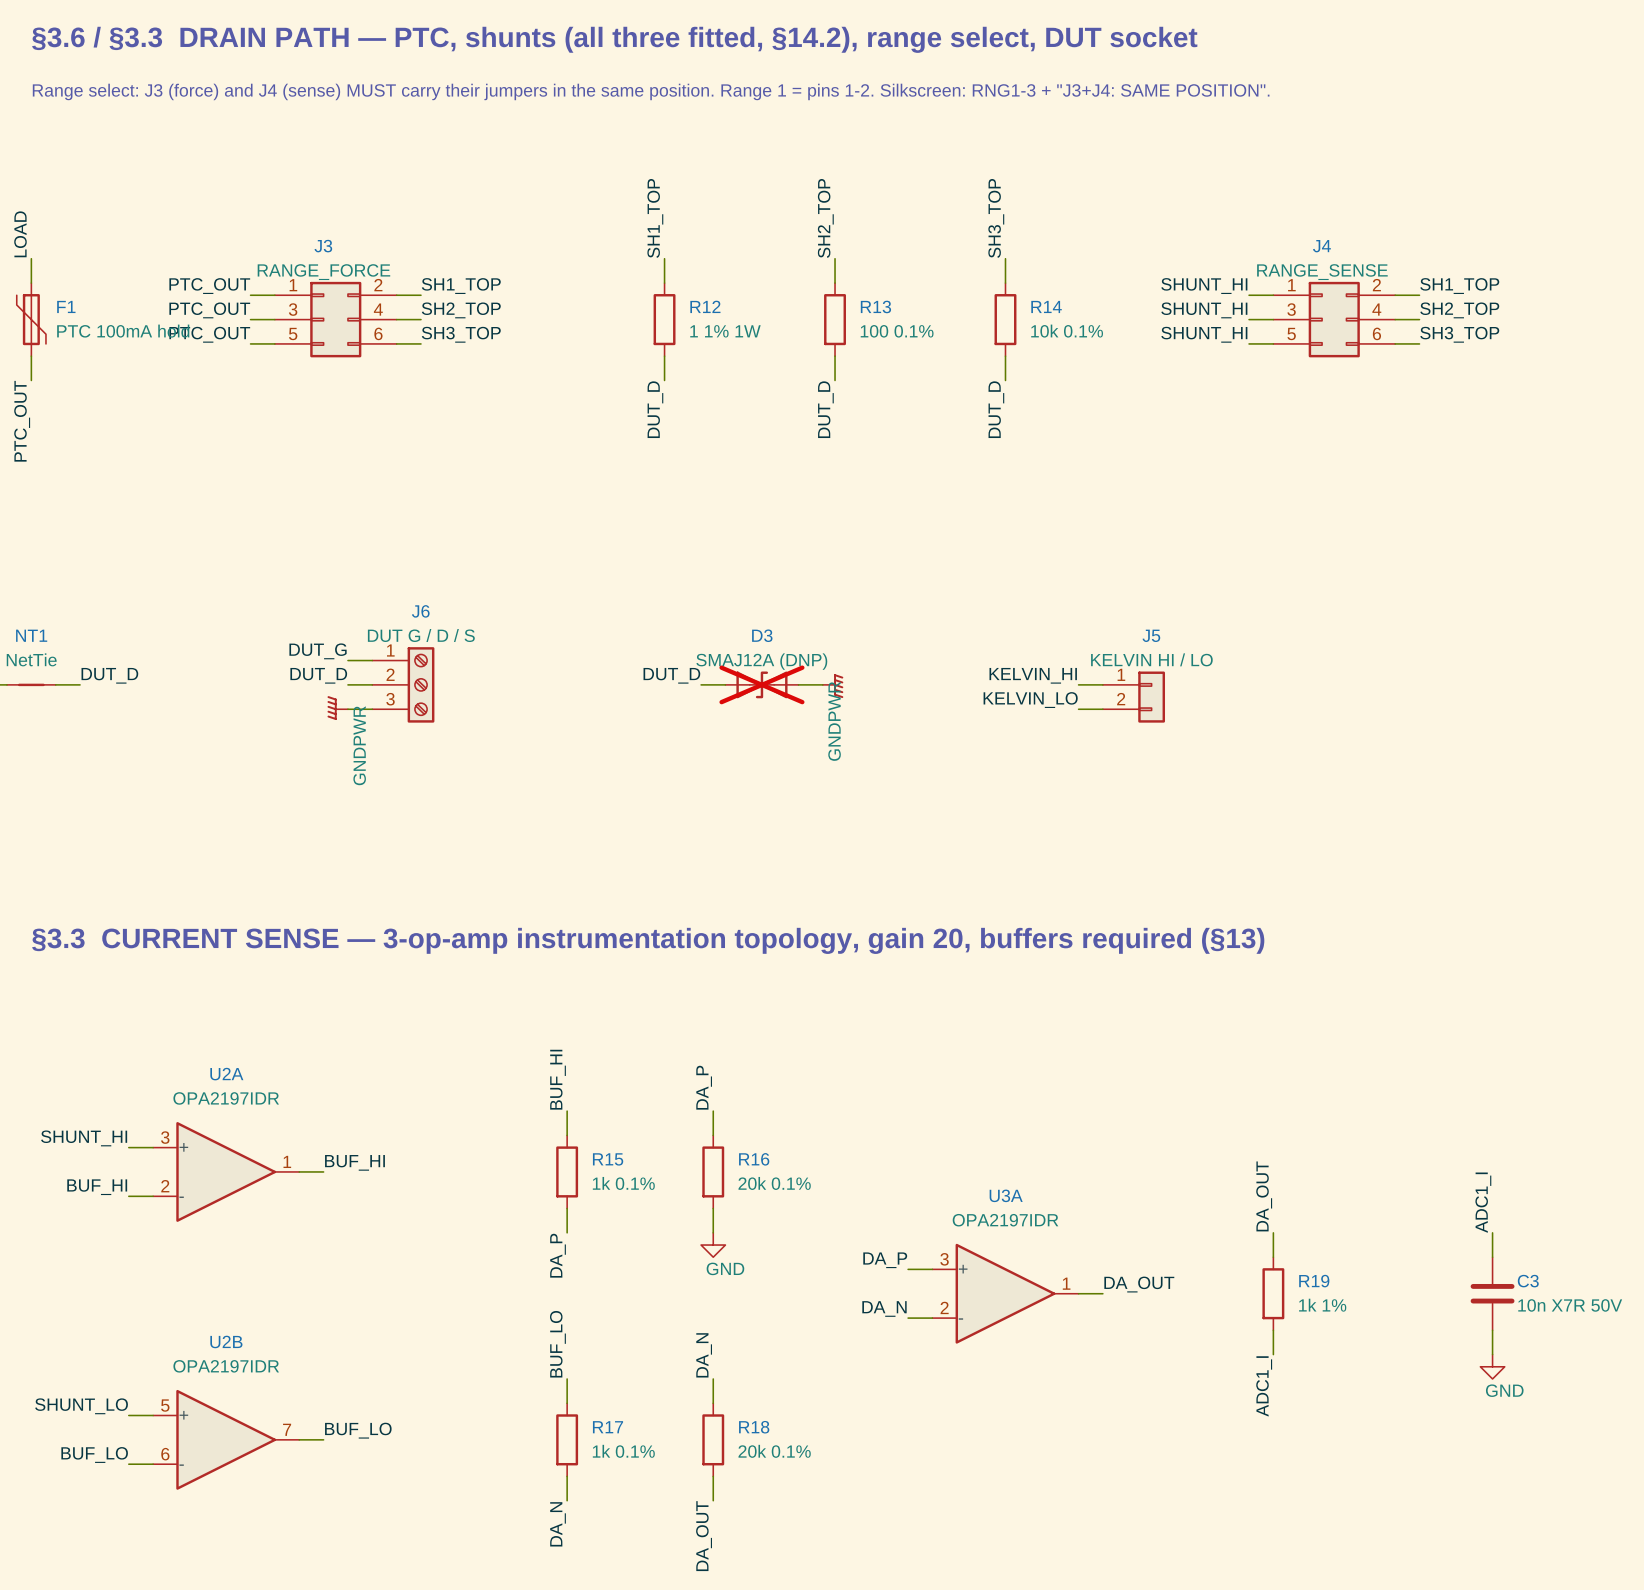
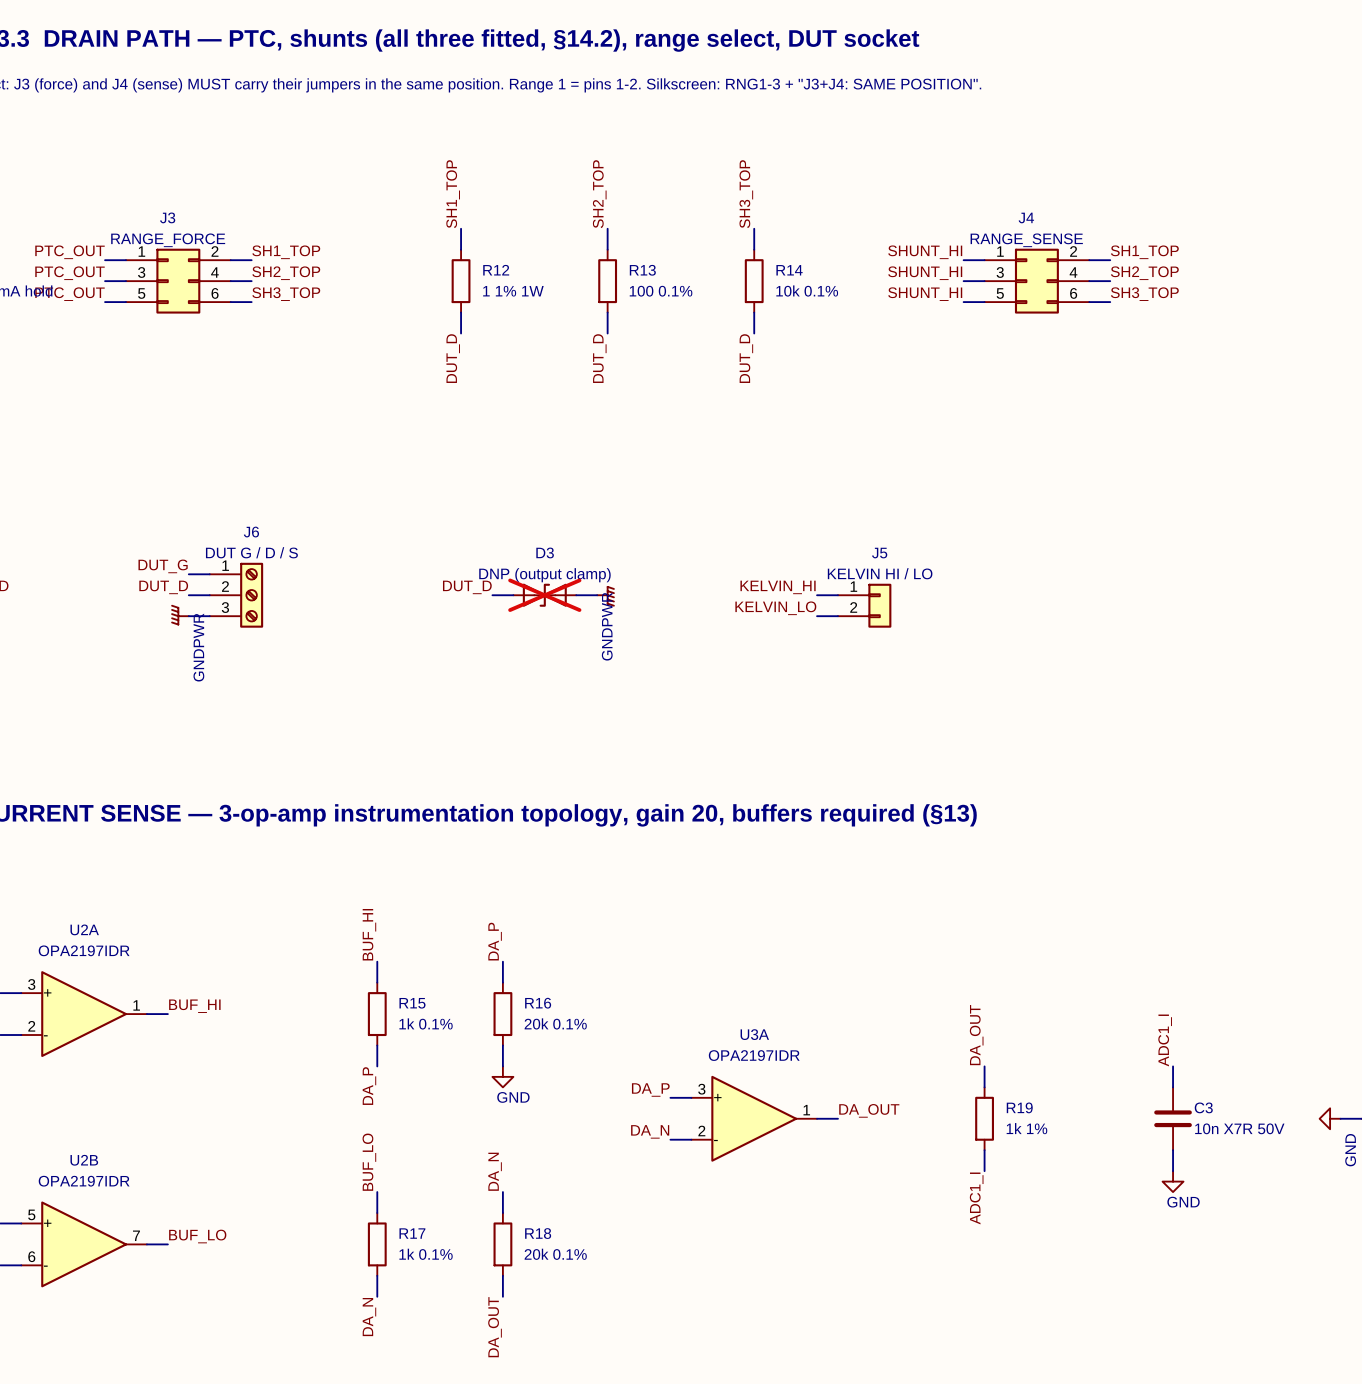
D3 value: SMAJ12A (DNP) (761, 661) -> DNP (output clamp) (544, 575)

